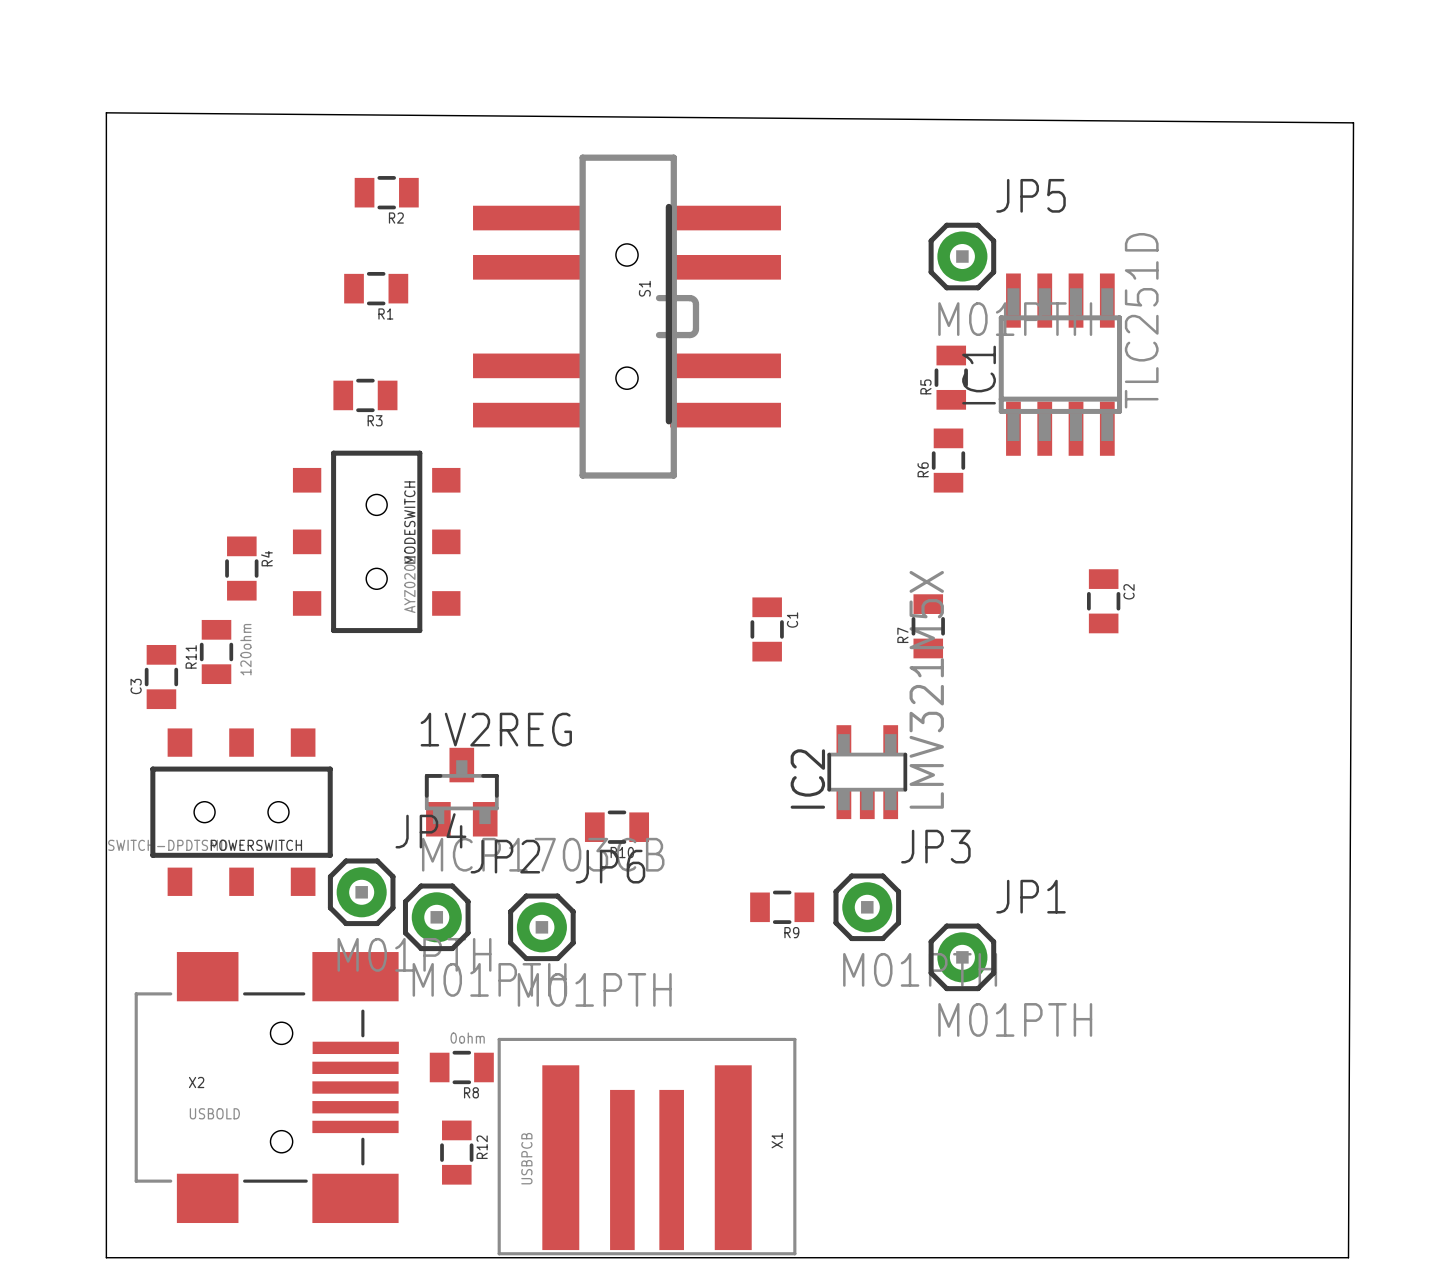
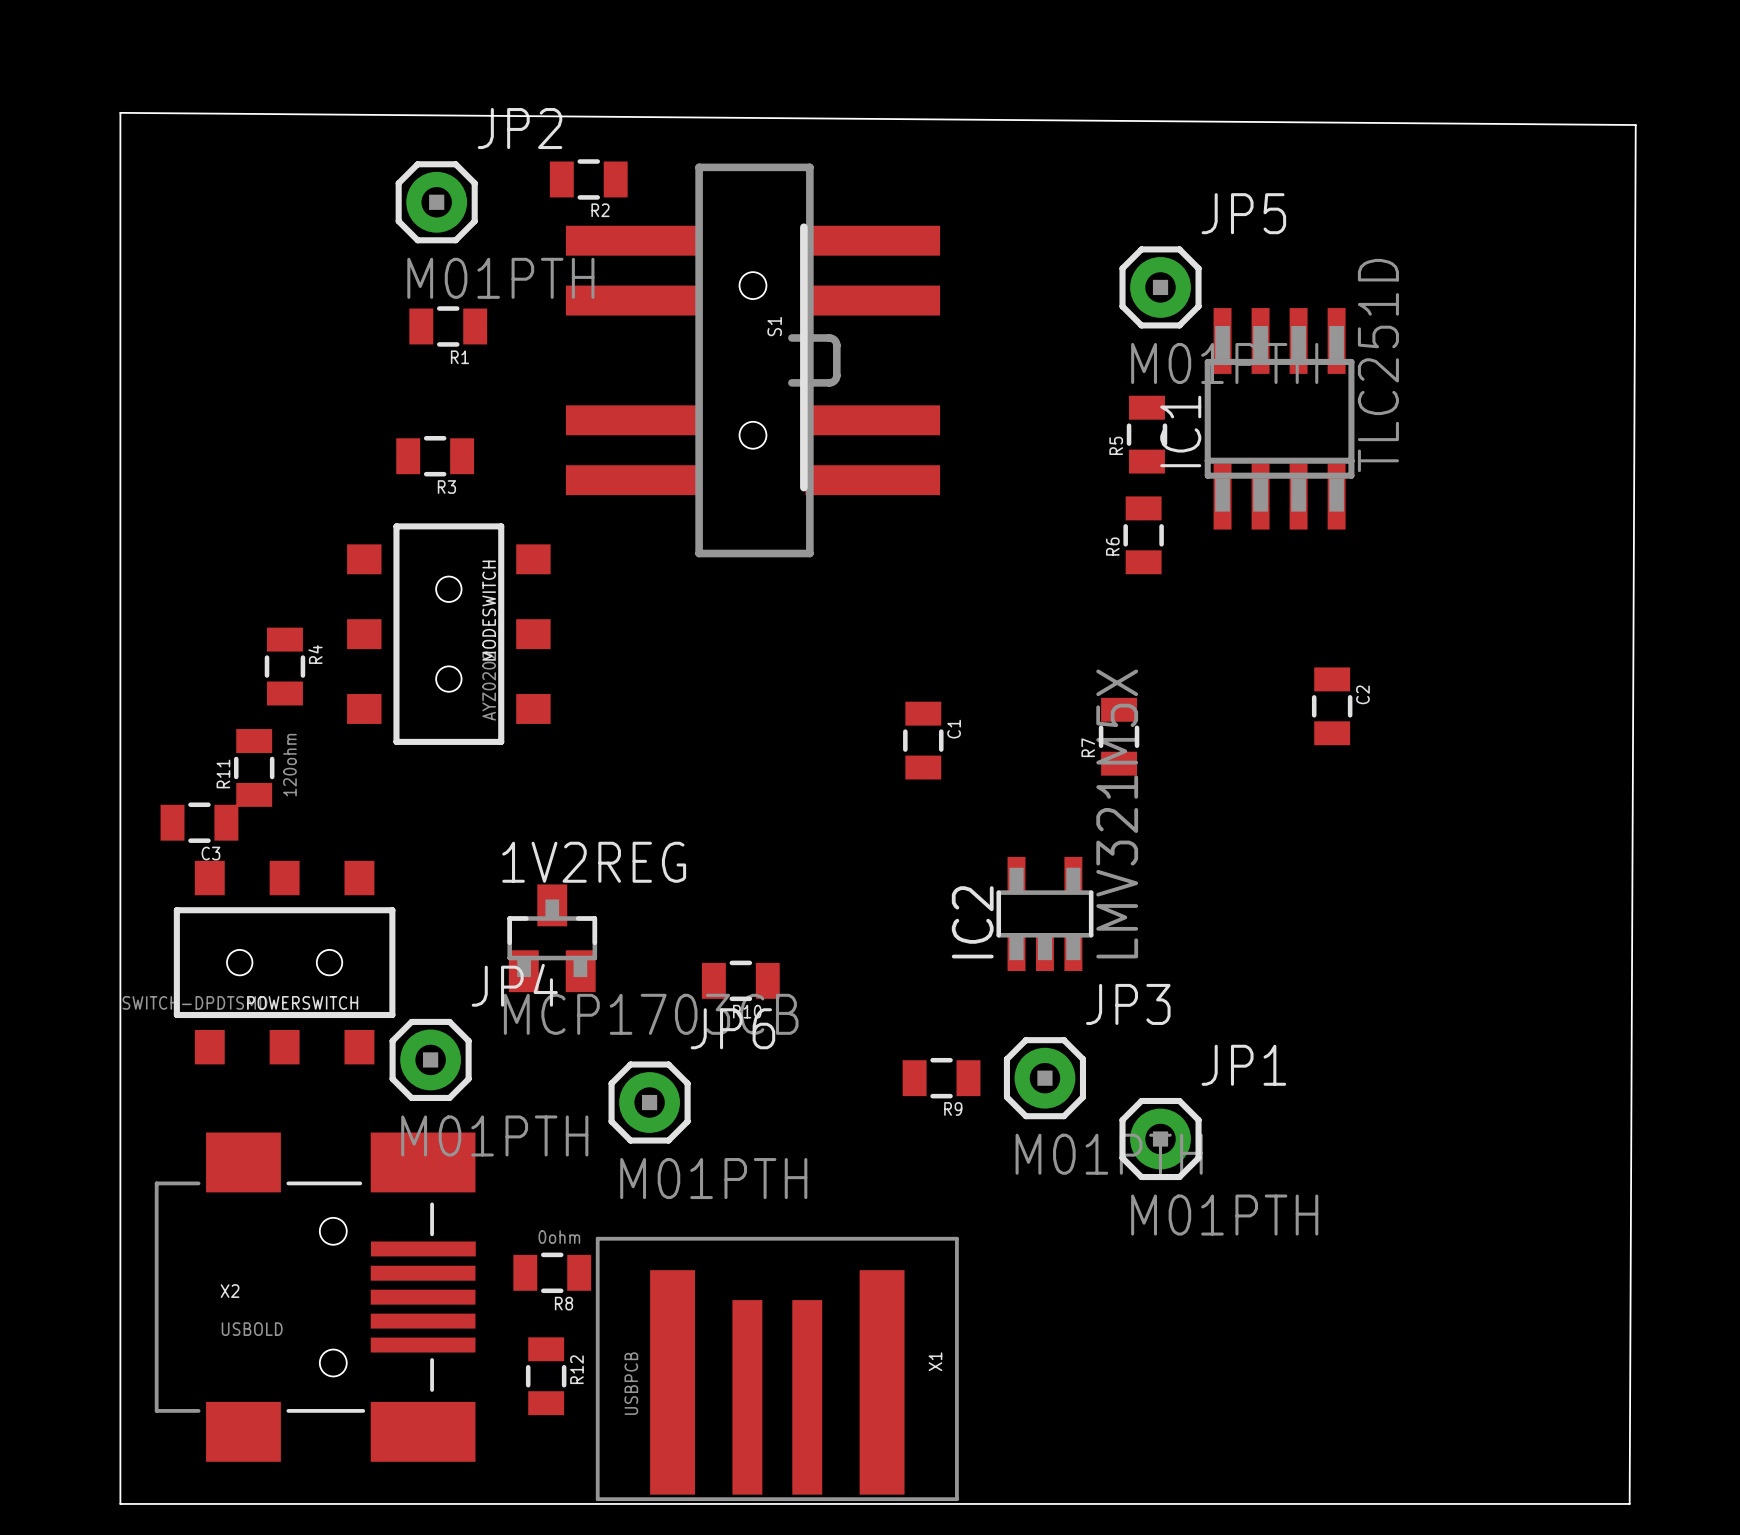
R2 position: (386, 192) -> (588, 179)
C3 rotation: 0° (161, 677) -> 90° clockwise (199, 822)
JP2 position: (436, 917) -> (436, 202)

